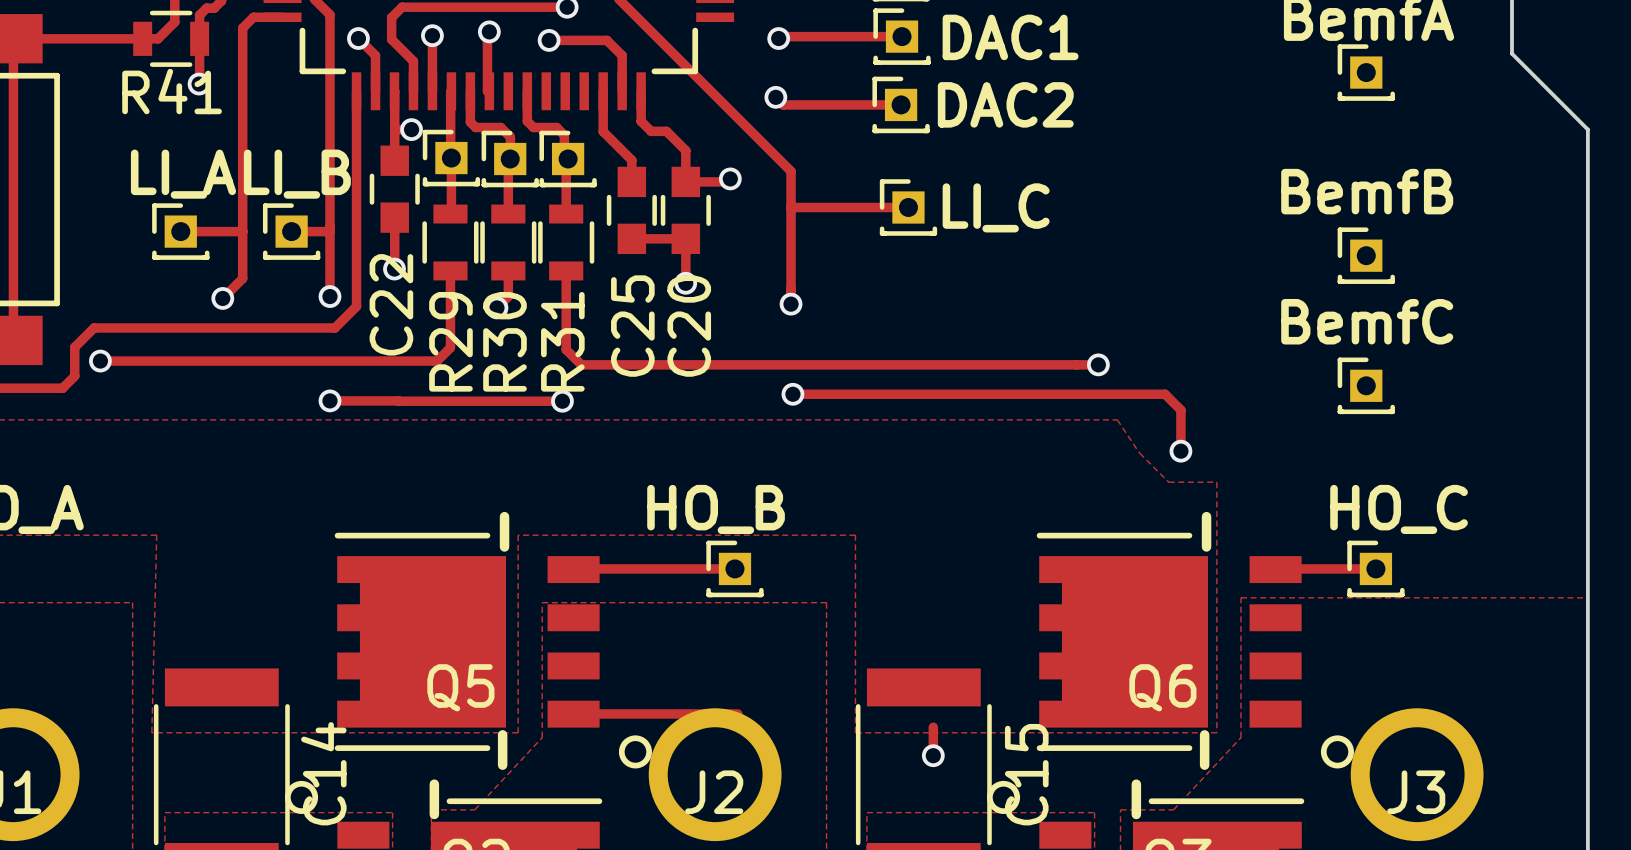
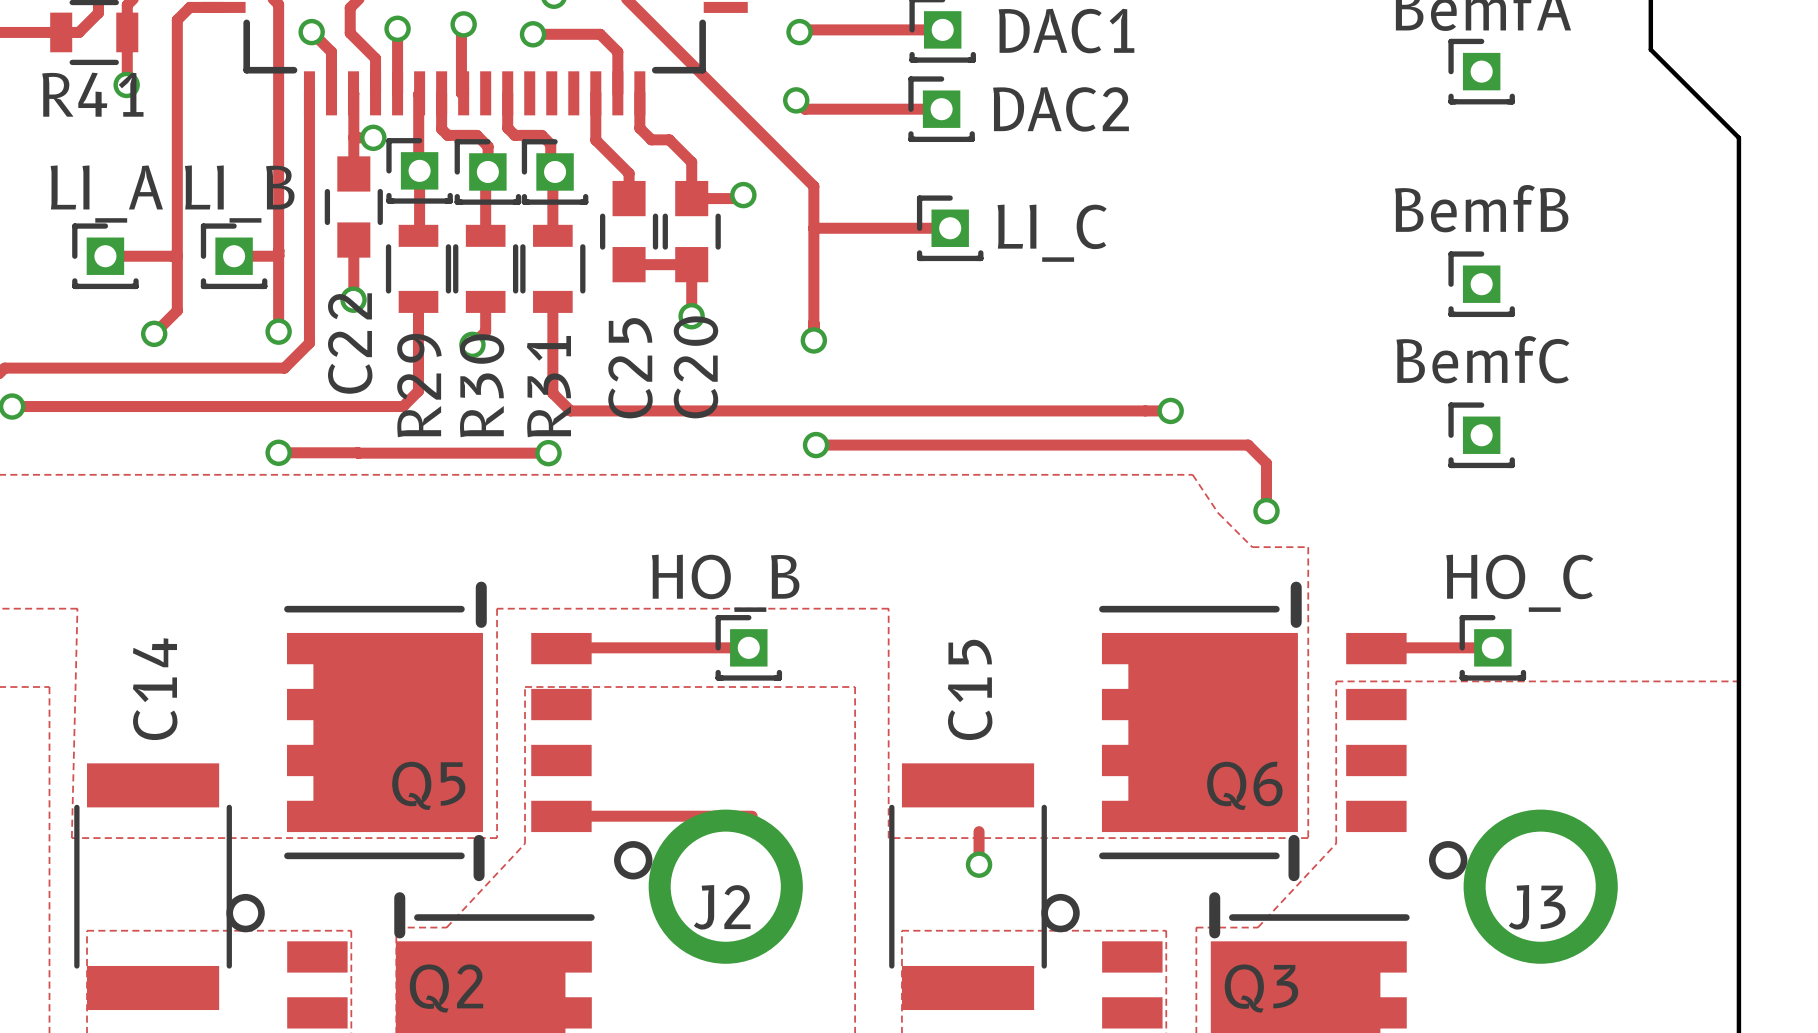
C14 name position: C14 (323, 773) -> C14 (155, 689)
C15 name position: C15 (1026, 774) -> C15 (970, 689)

